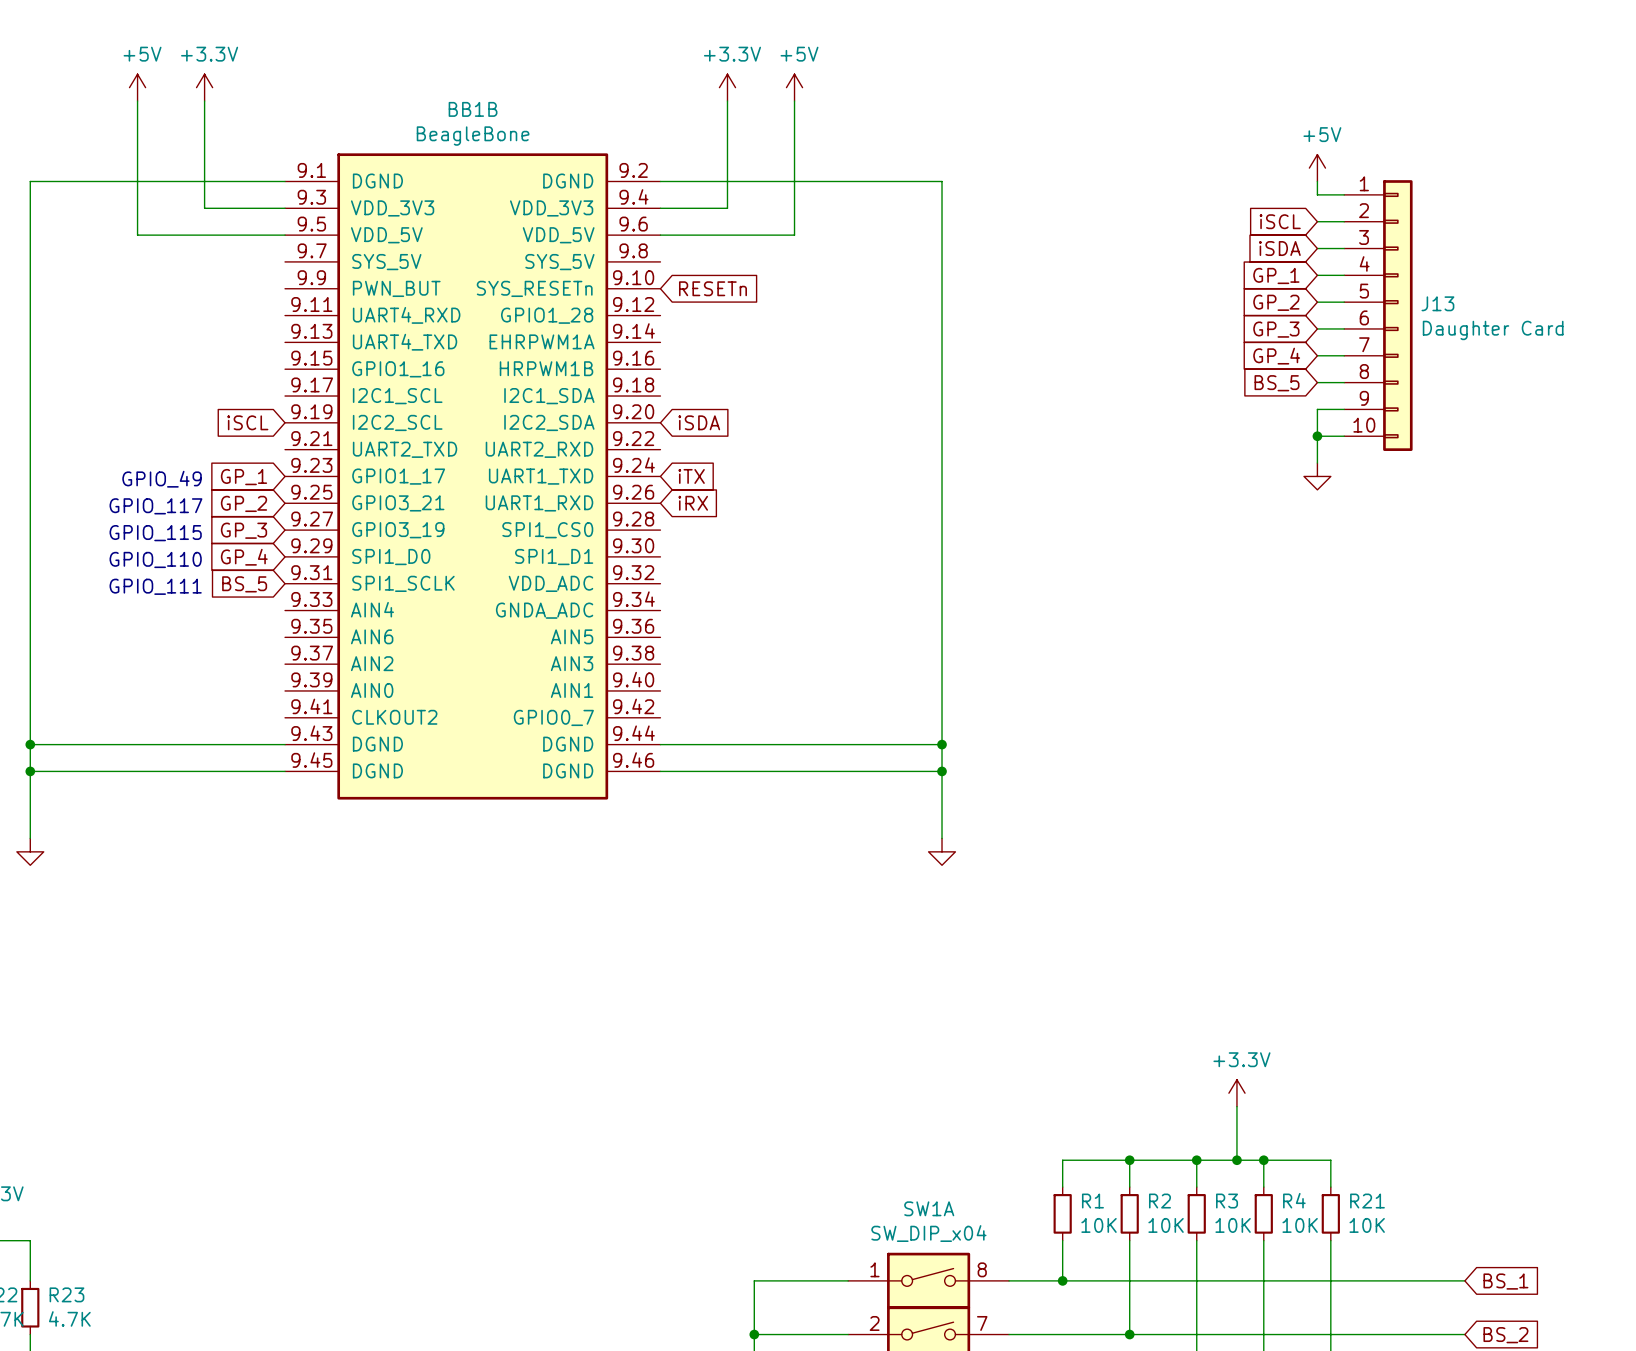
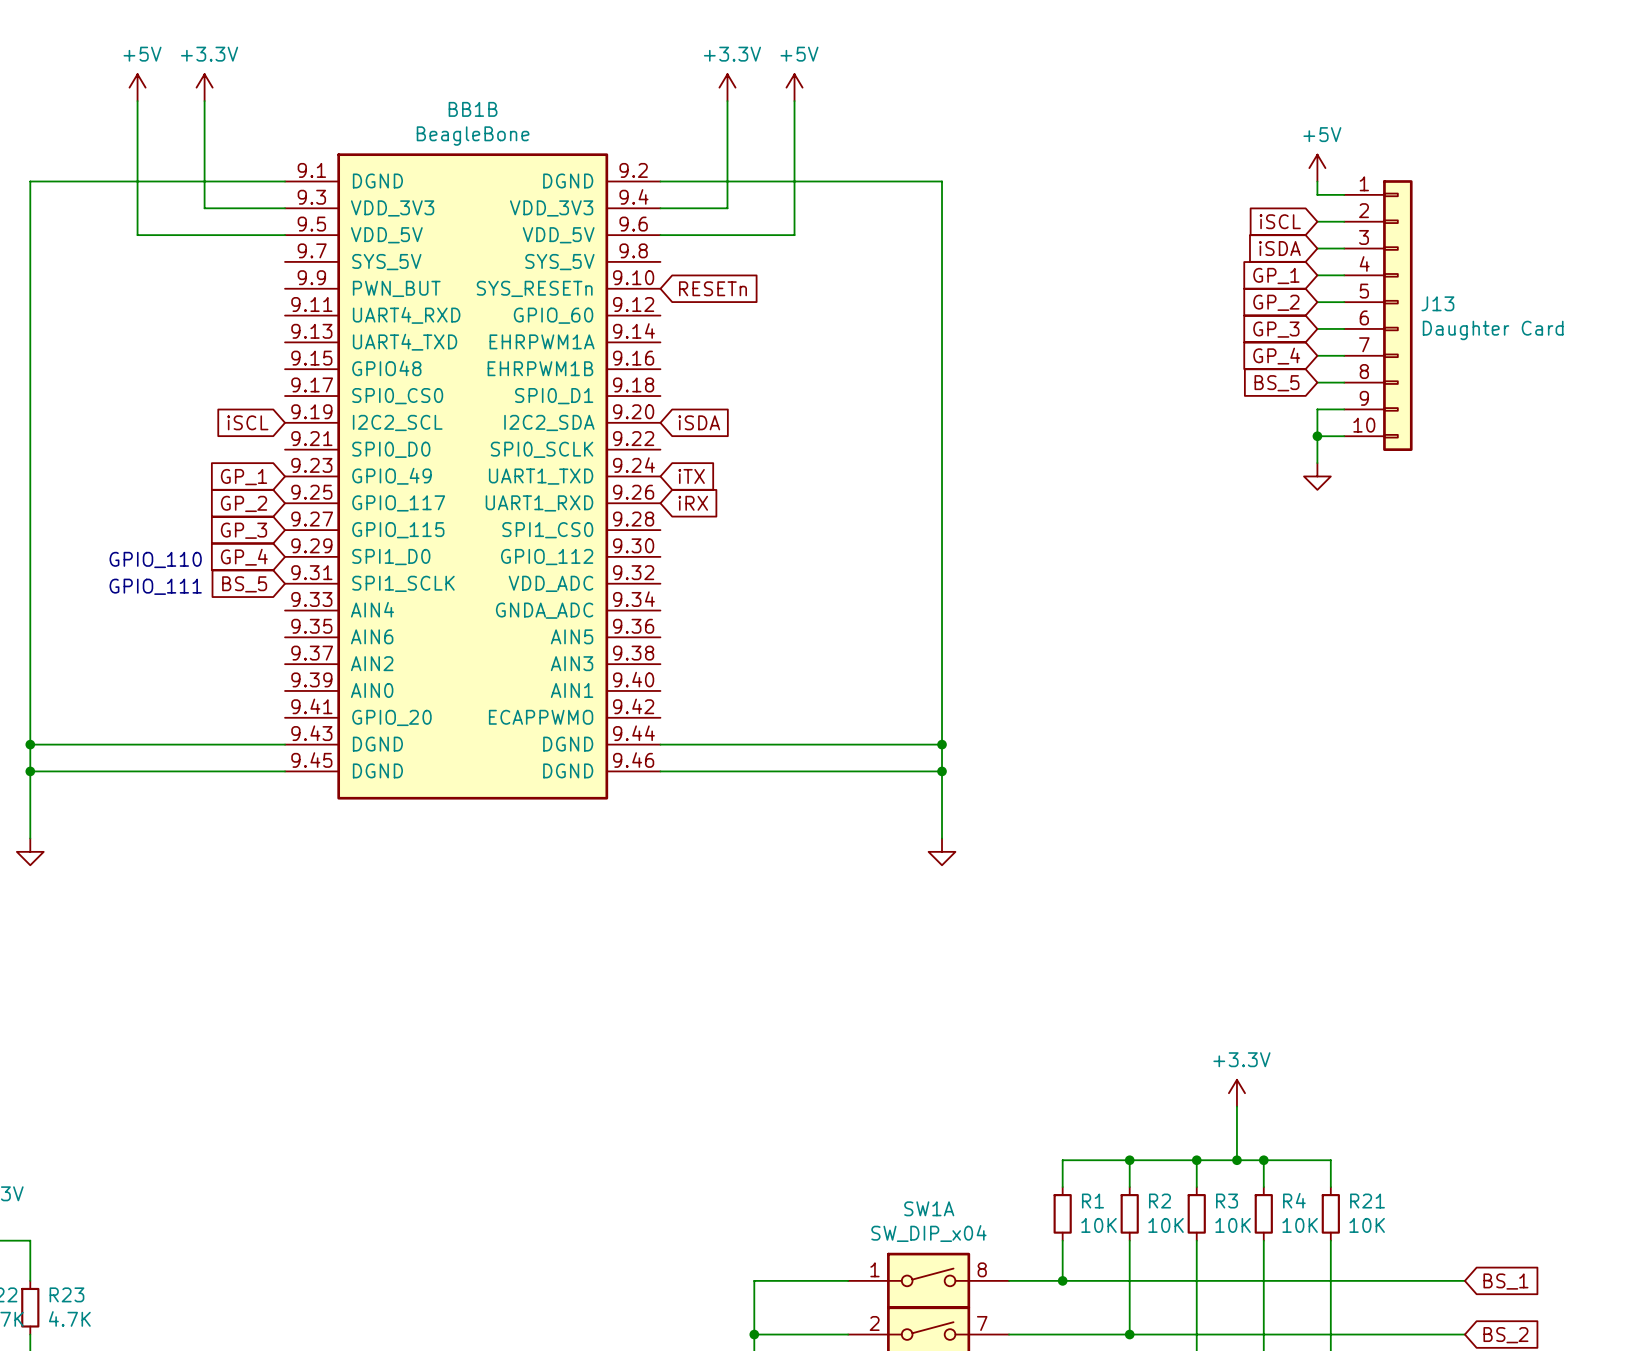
BB1B symbol: [285, 153, 661, 800] -> [285, 153, 661, 800]
text: GPIO_49 (162, 479) -> none
text: GPIO_117 (155, 506) -> none
text: GPIO_115 (155, 533) -> none

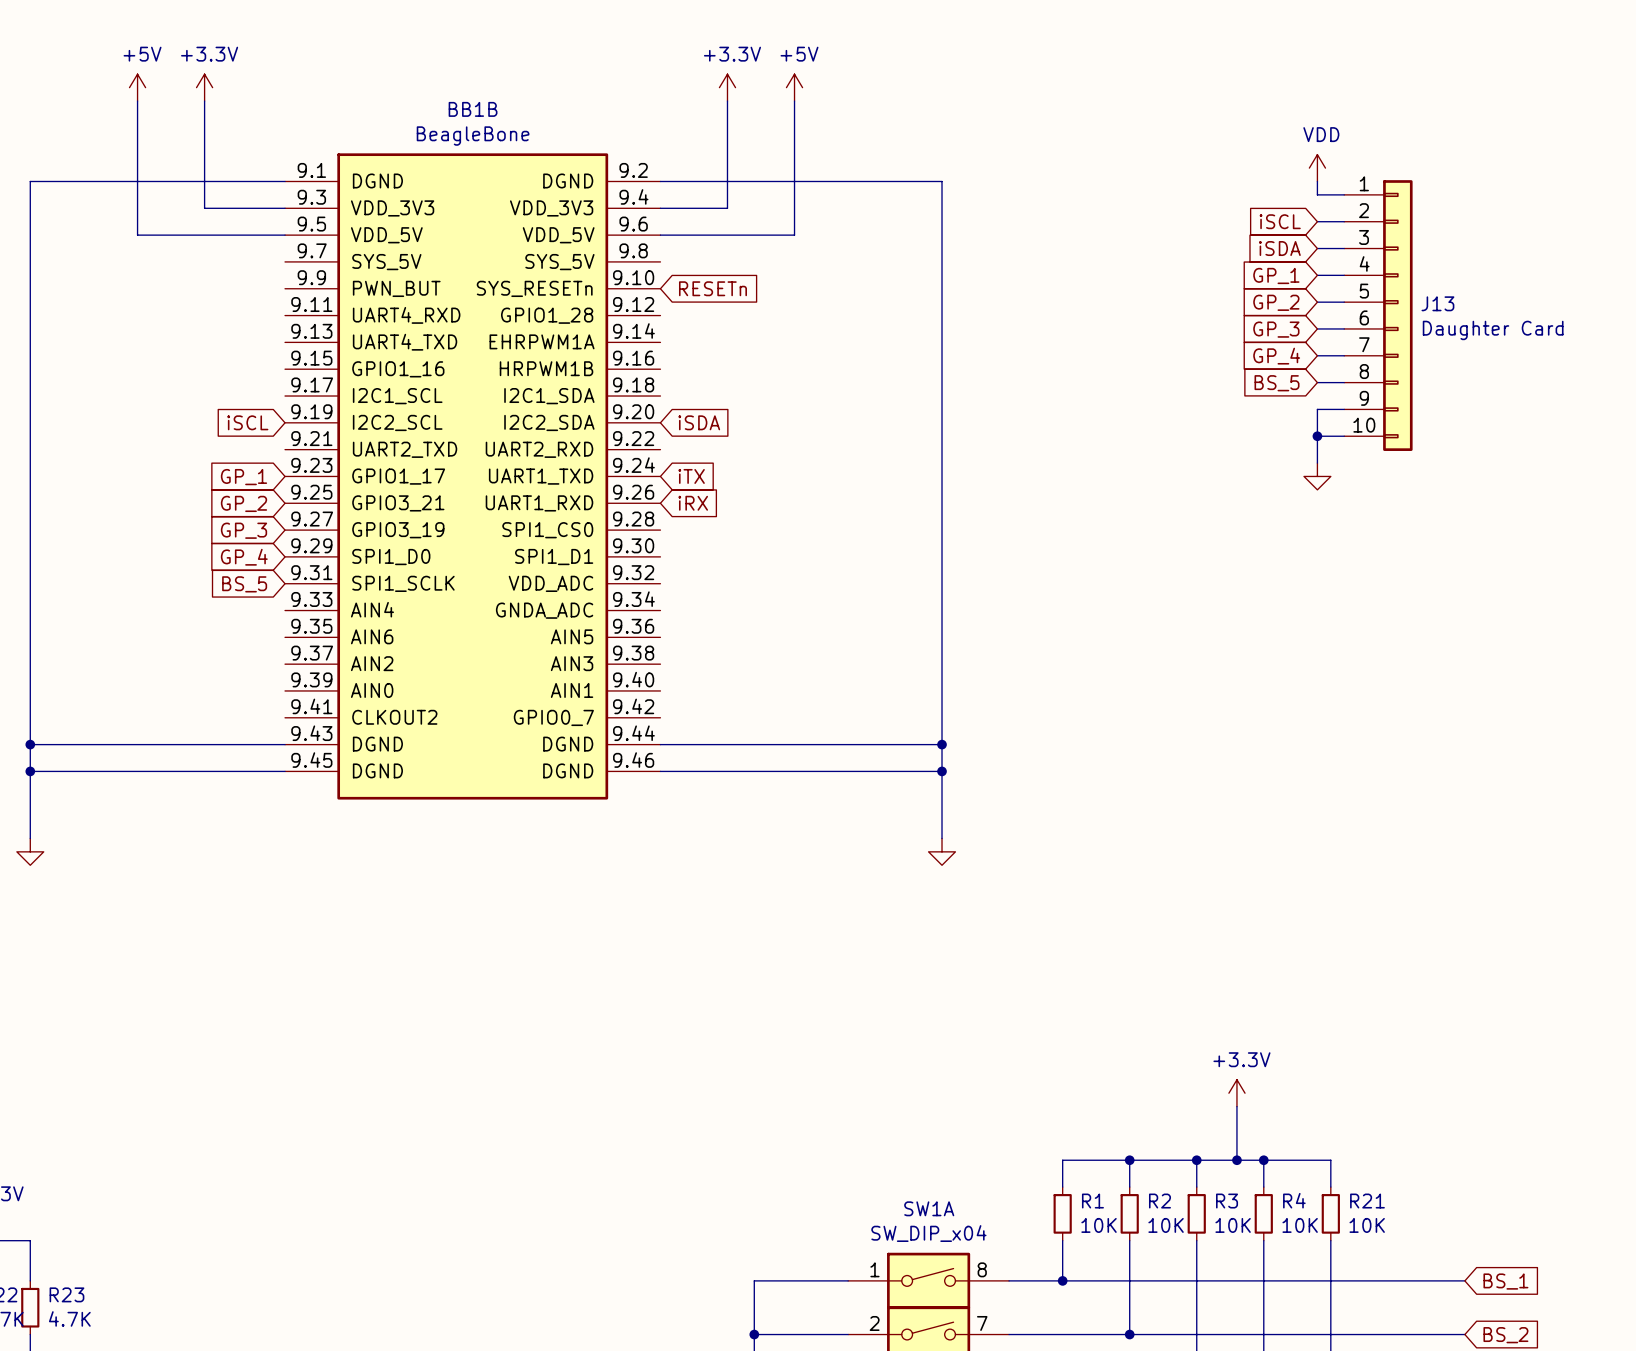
BB1B symbol: [285, 153, 661, 800] -> [285, 153, 661, 800]
power symbol: +5V (1317, 168) -> VDD (1317, 168)
text: GPIO_110 (155, 559) -> none
text: GPIO_111 (155, 586) -> none

